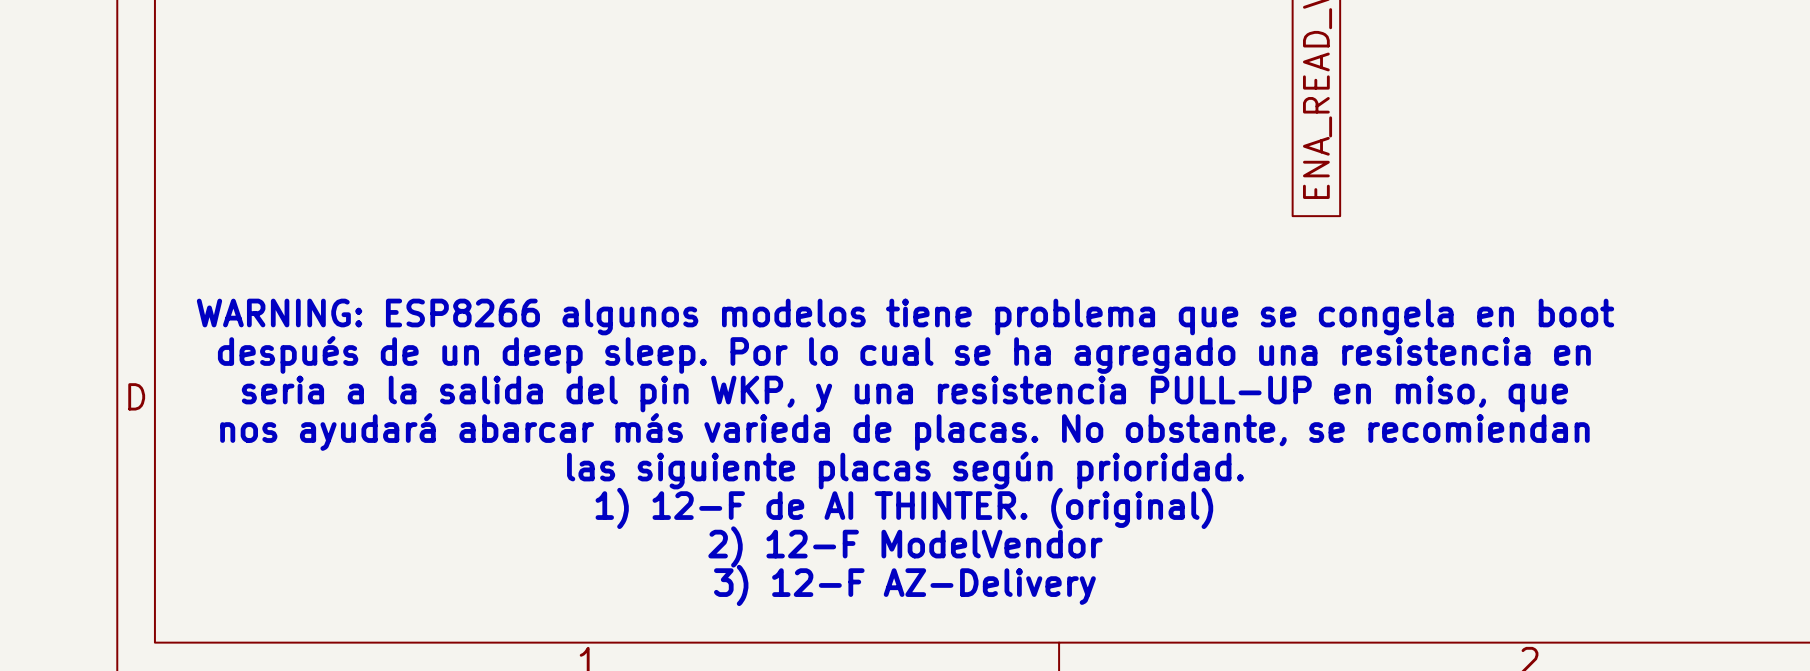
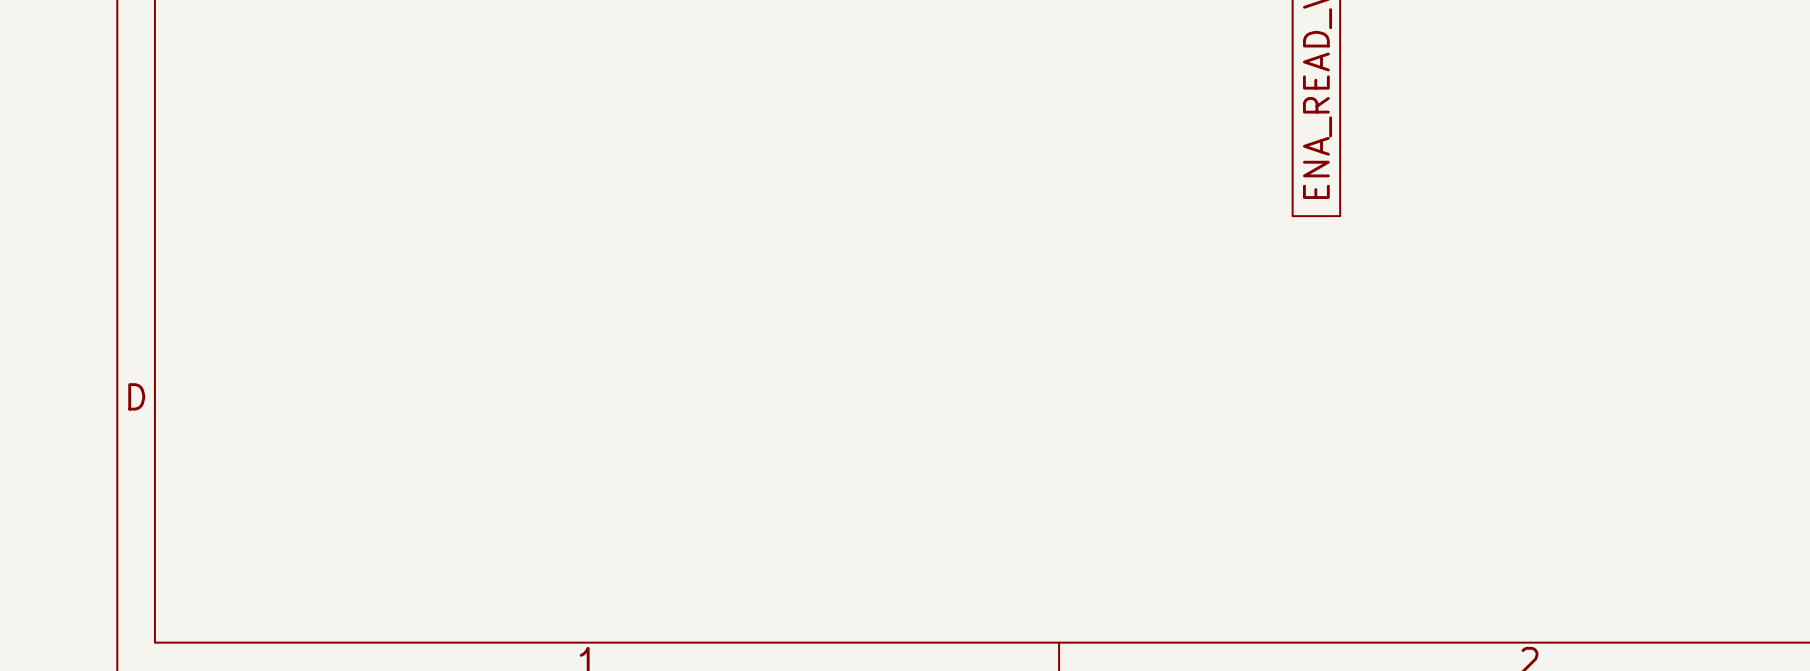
text: WARNING: ESP8266 algunos modelos tiene problema que se congela en boot (905, 316) -> none
text: después de un deep sleep. Por lo cual se ha agregado una resistencia en (904, 354) -> none
text: seria a la salida del pin WKP, y una resistencia PULL-UP en miso, que (904, 394) -> none
text: nos ayudará abarcar más varieda de placas. No obstante, se recomiendan (904, 431) -> none
text: las siguiente placas según prioridad. (905, 470) -> none
text: 1) 12-F de AI THINTER. (original) (904, 508) -> none
text: 2) 12-F ModelVendor (905, 546) -> none
text: 3) 12-F AZ-Delivery (904, 585) -> none

